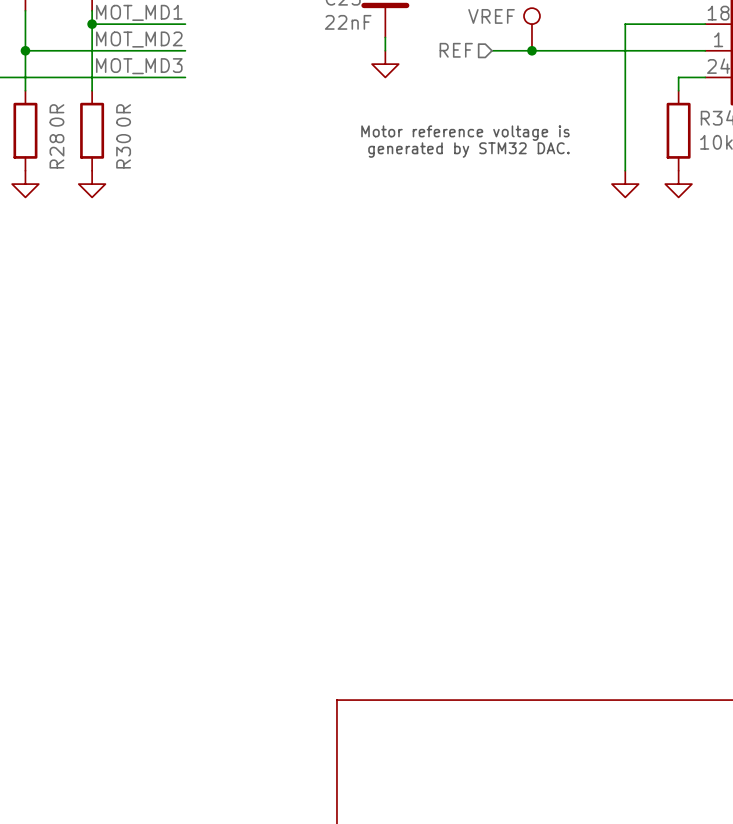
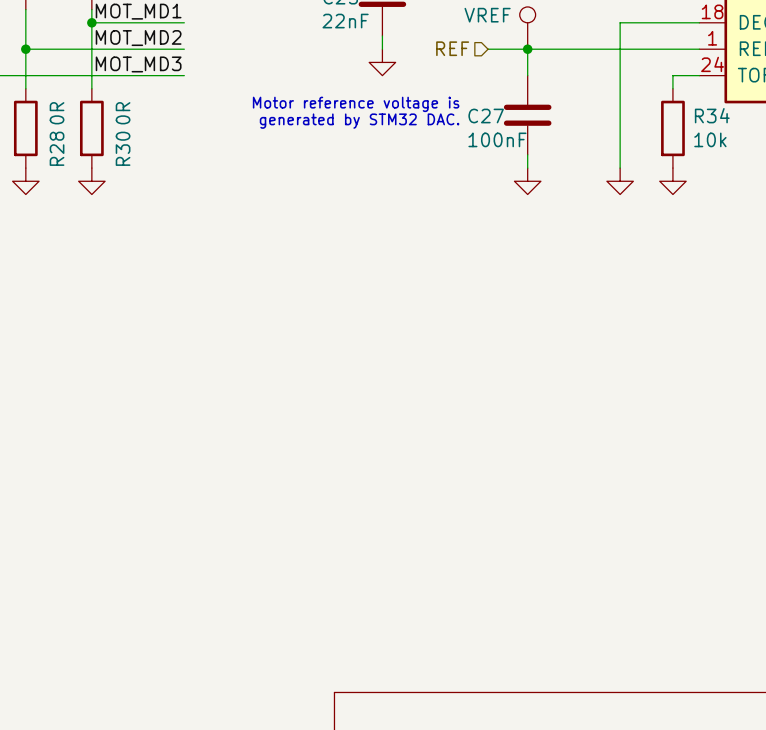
wire: none -> (527, 49) (527, 75)
C27: none -> 100nF (527, 115)
text position: Motor reference voltage is (465, 133) -> Motor reference voltage is (356, 104)
text position: generated by STM32 DAC. (468, 150) -> generated by STM32 DAC. (359, 121)
wire: none -> (527, 154) (527, 168)
power symbol: none -> (527, 181)

